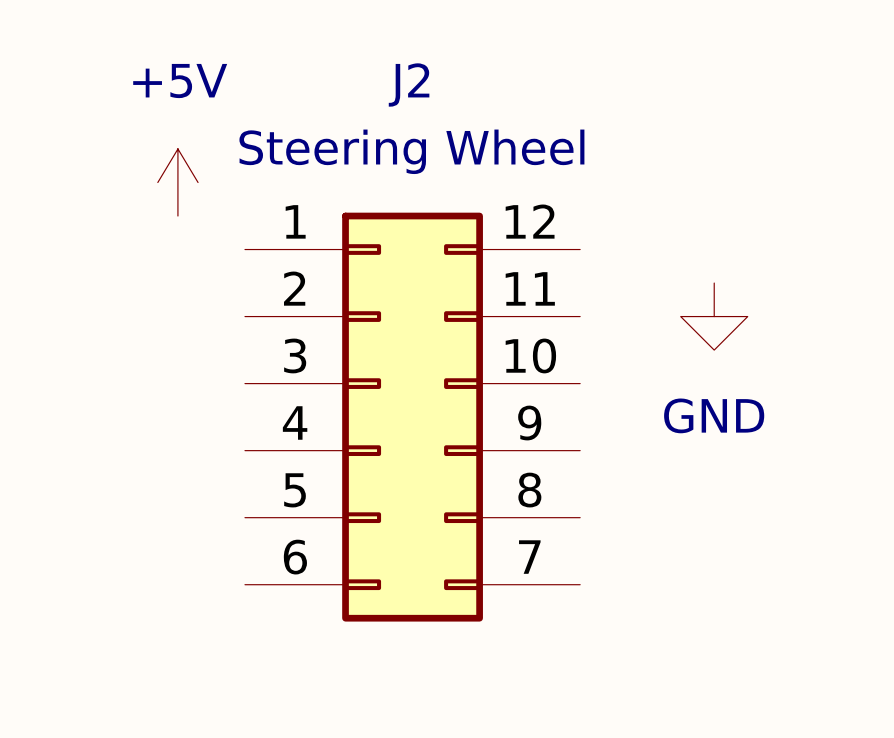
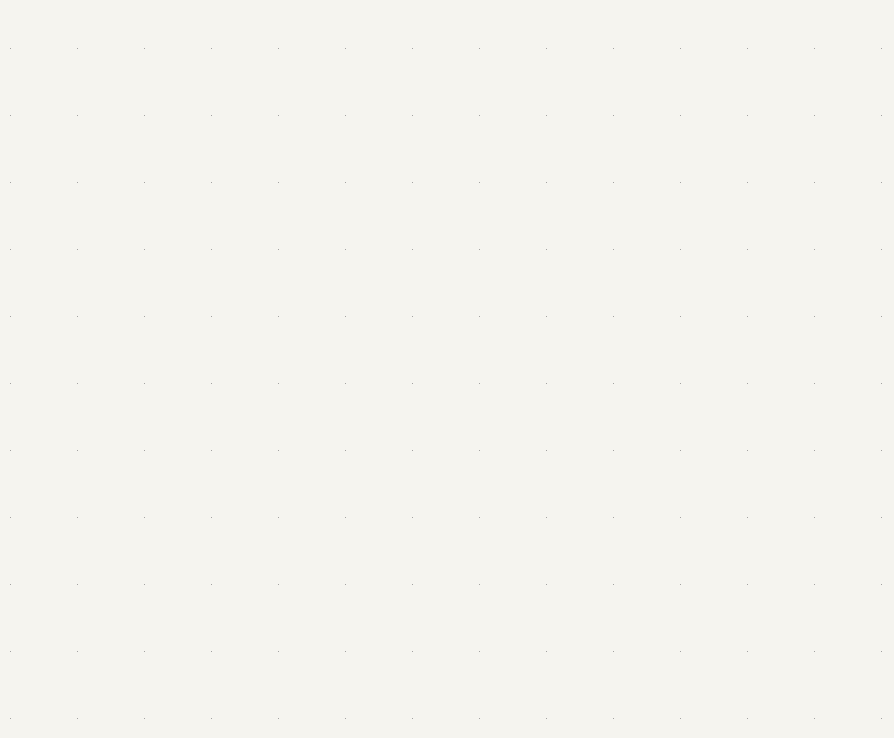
power symbol: +5V (177, 182) -> none
power symbol: GND (714, 316) -> none
J2: Steering Wheel (412, 417) -> none

